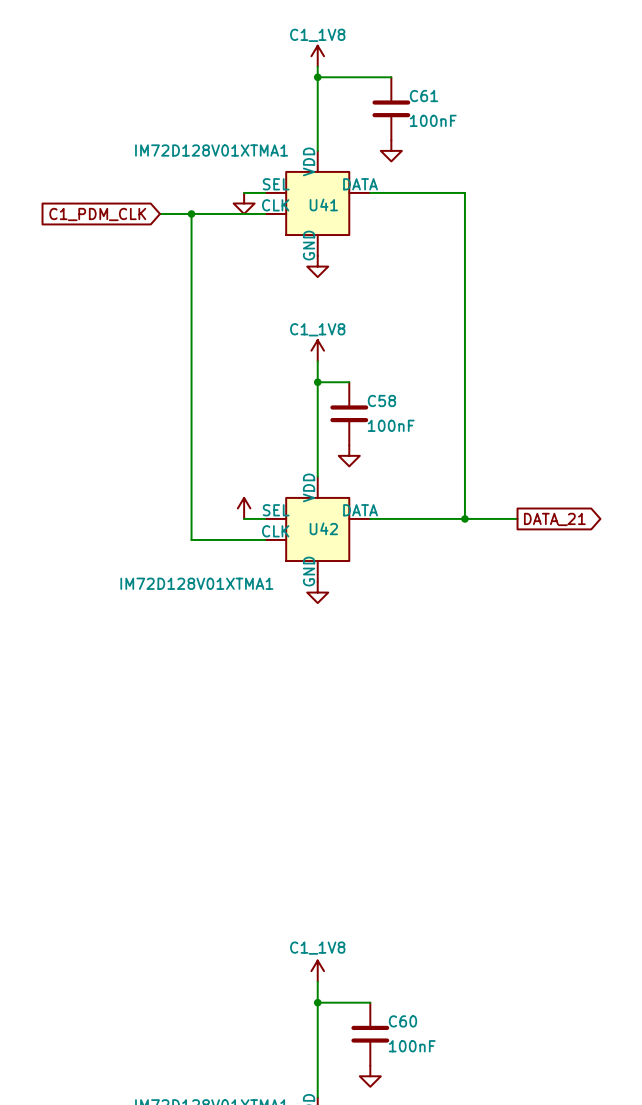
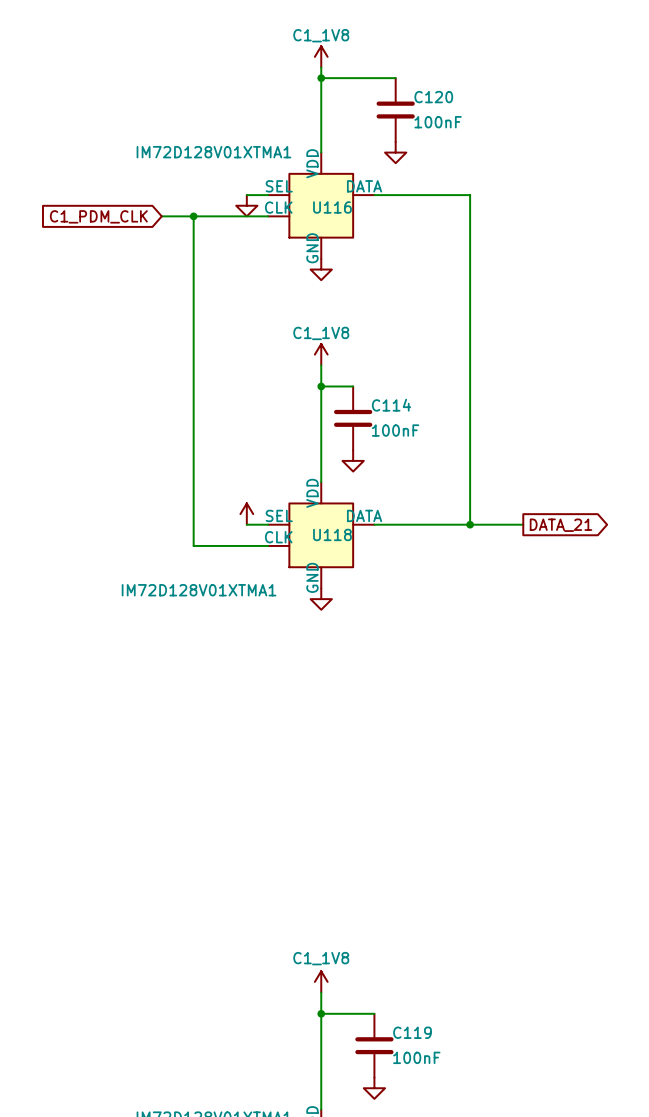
C61 name: C61 (424, 96) -> C120 (433, 97)
U41 name: U41 (323, 204) -> U116 (332, 207)
C58 name: C58 (381, 400) -> C114 (391, 405)
U42 name: U42 (323, 528) -> U118 (332, 534)
C60 name: C60 (402, 1021) -> C119 (412, 1032)

